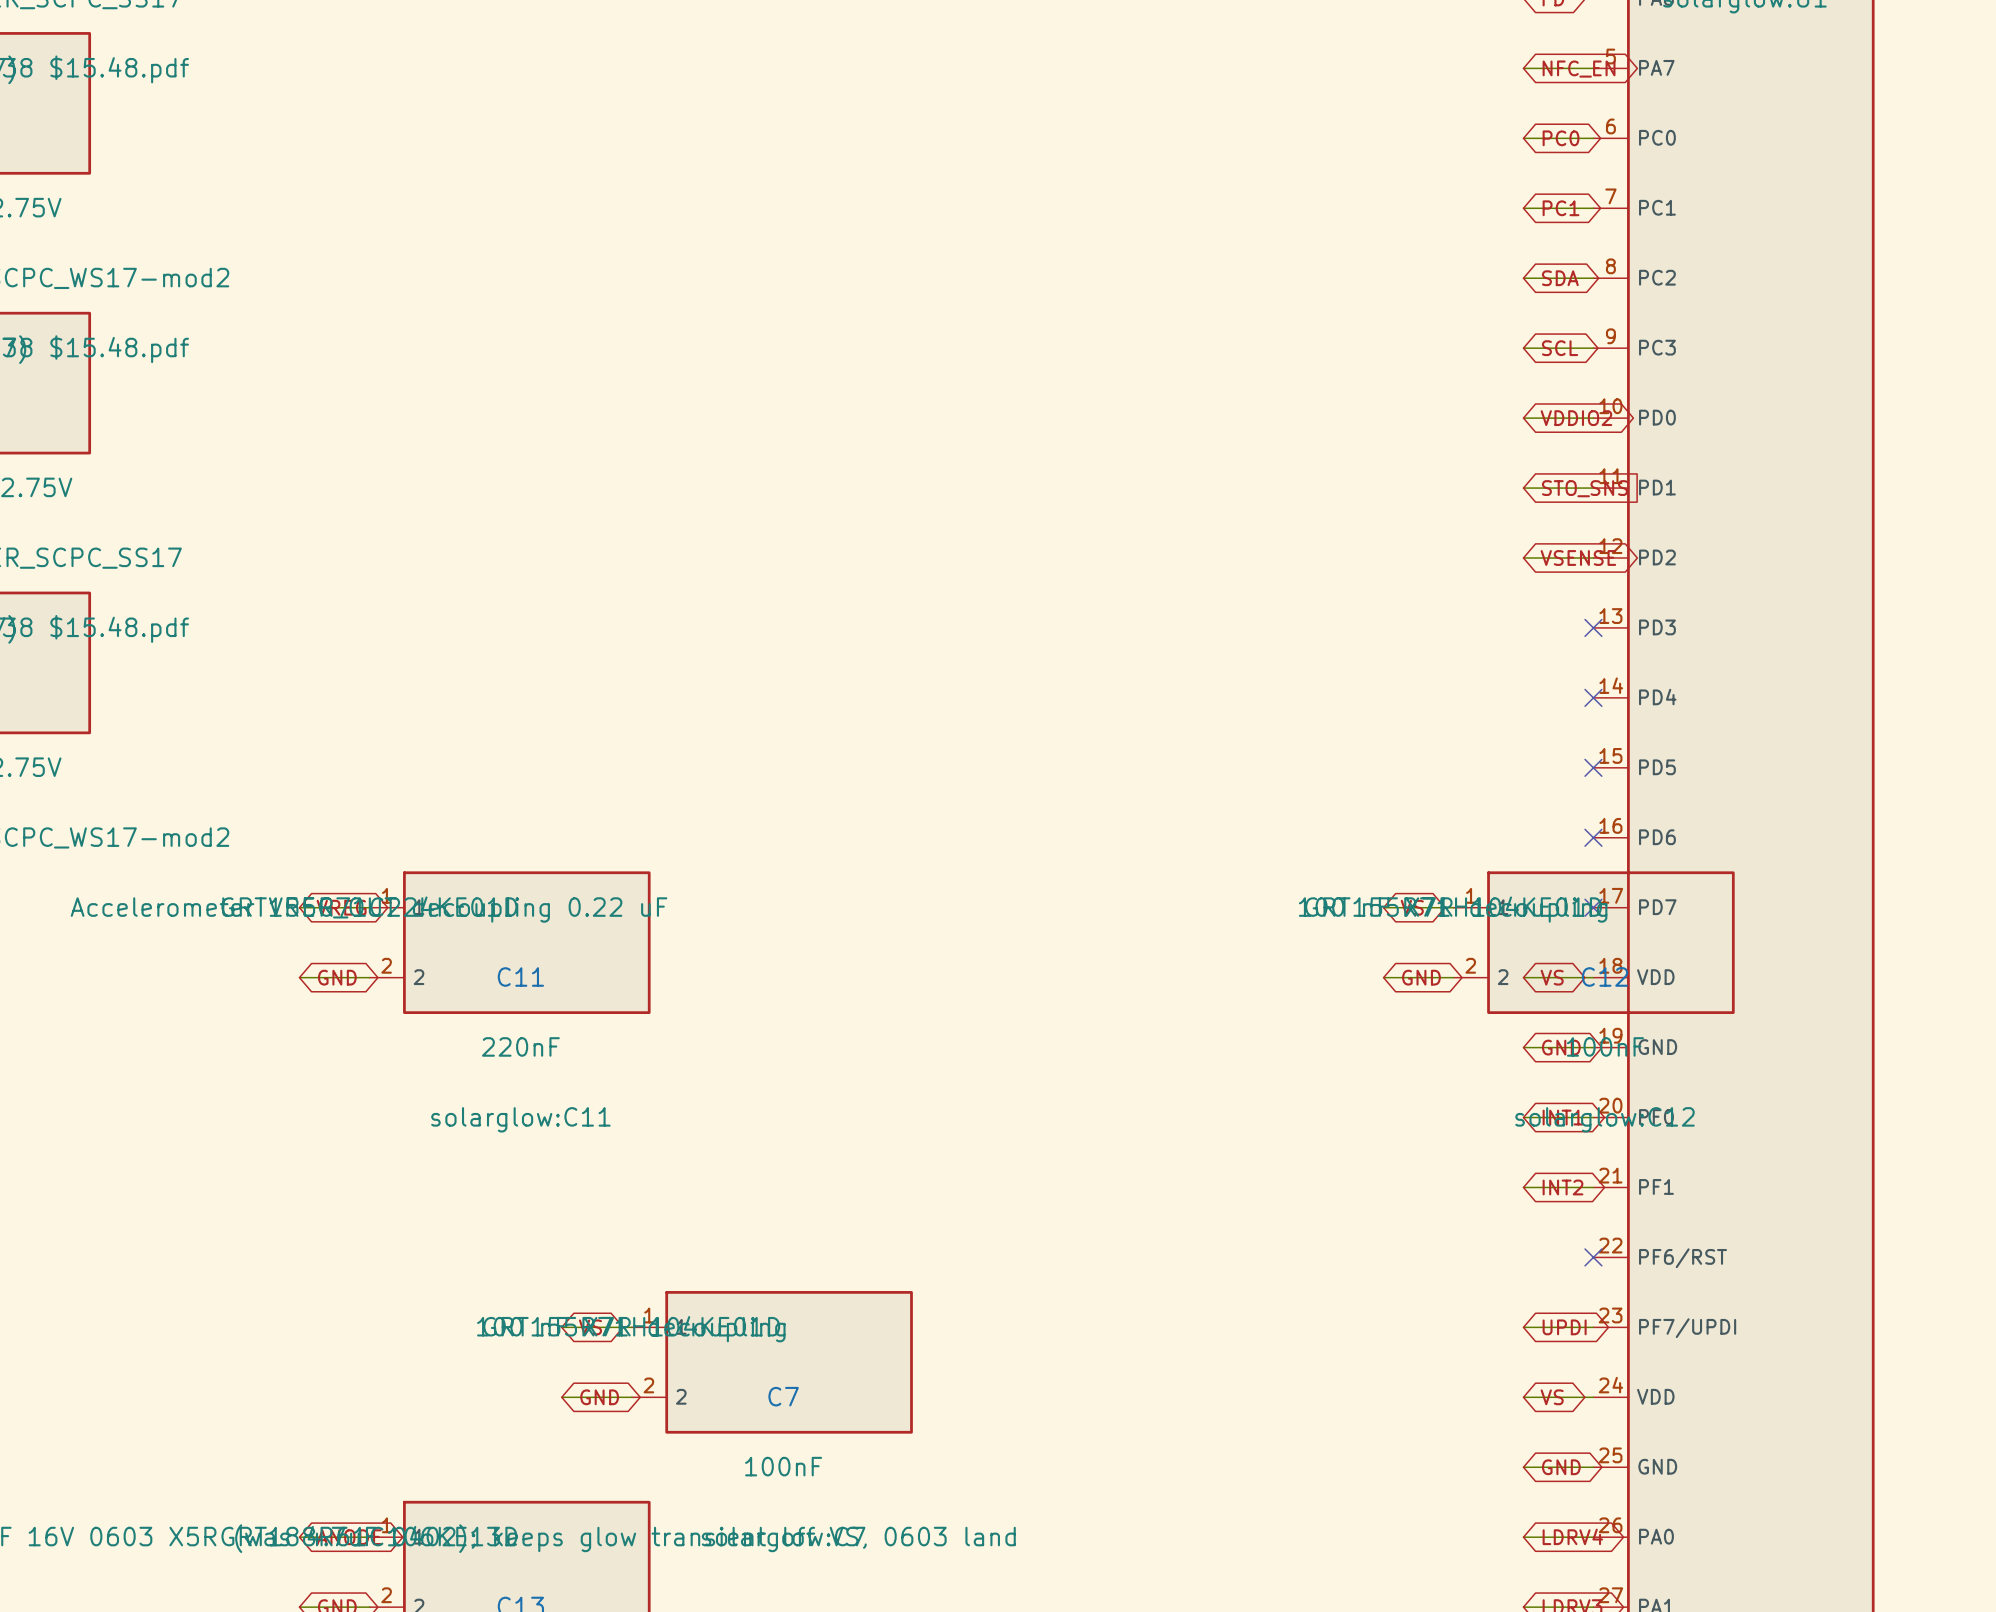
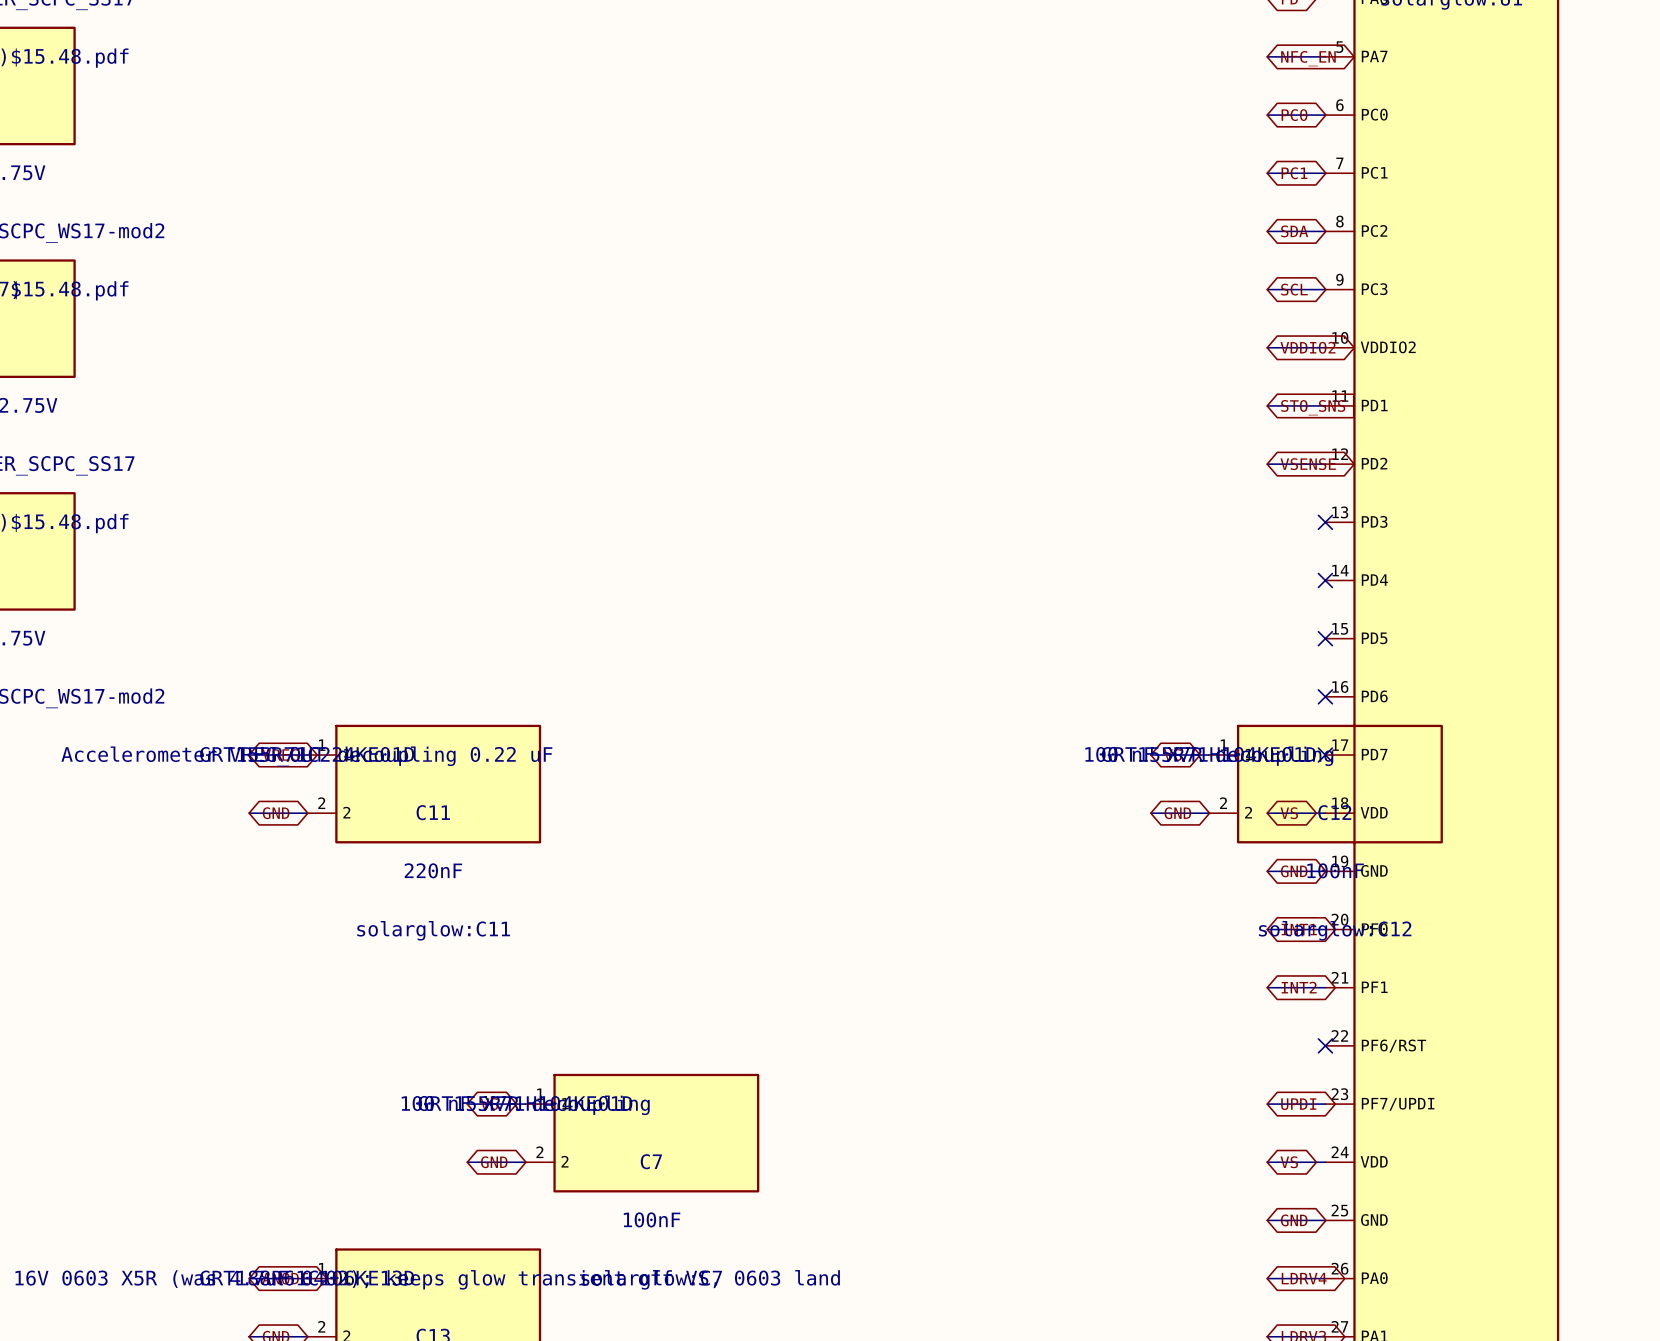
part pin name: PD0 (1657, 417) -> VDDIO2 (1388, 347)

